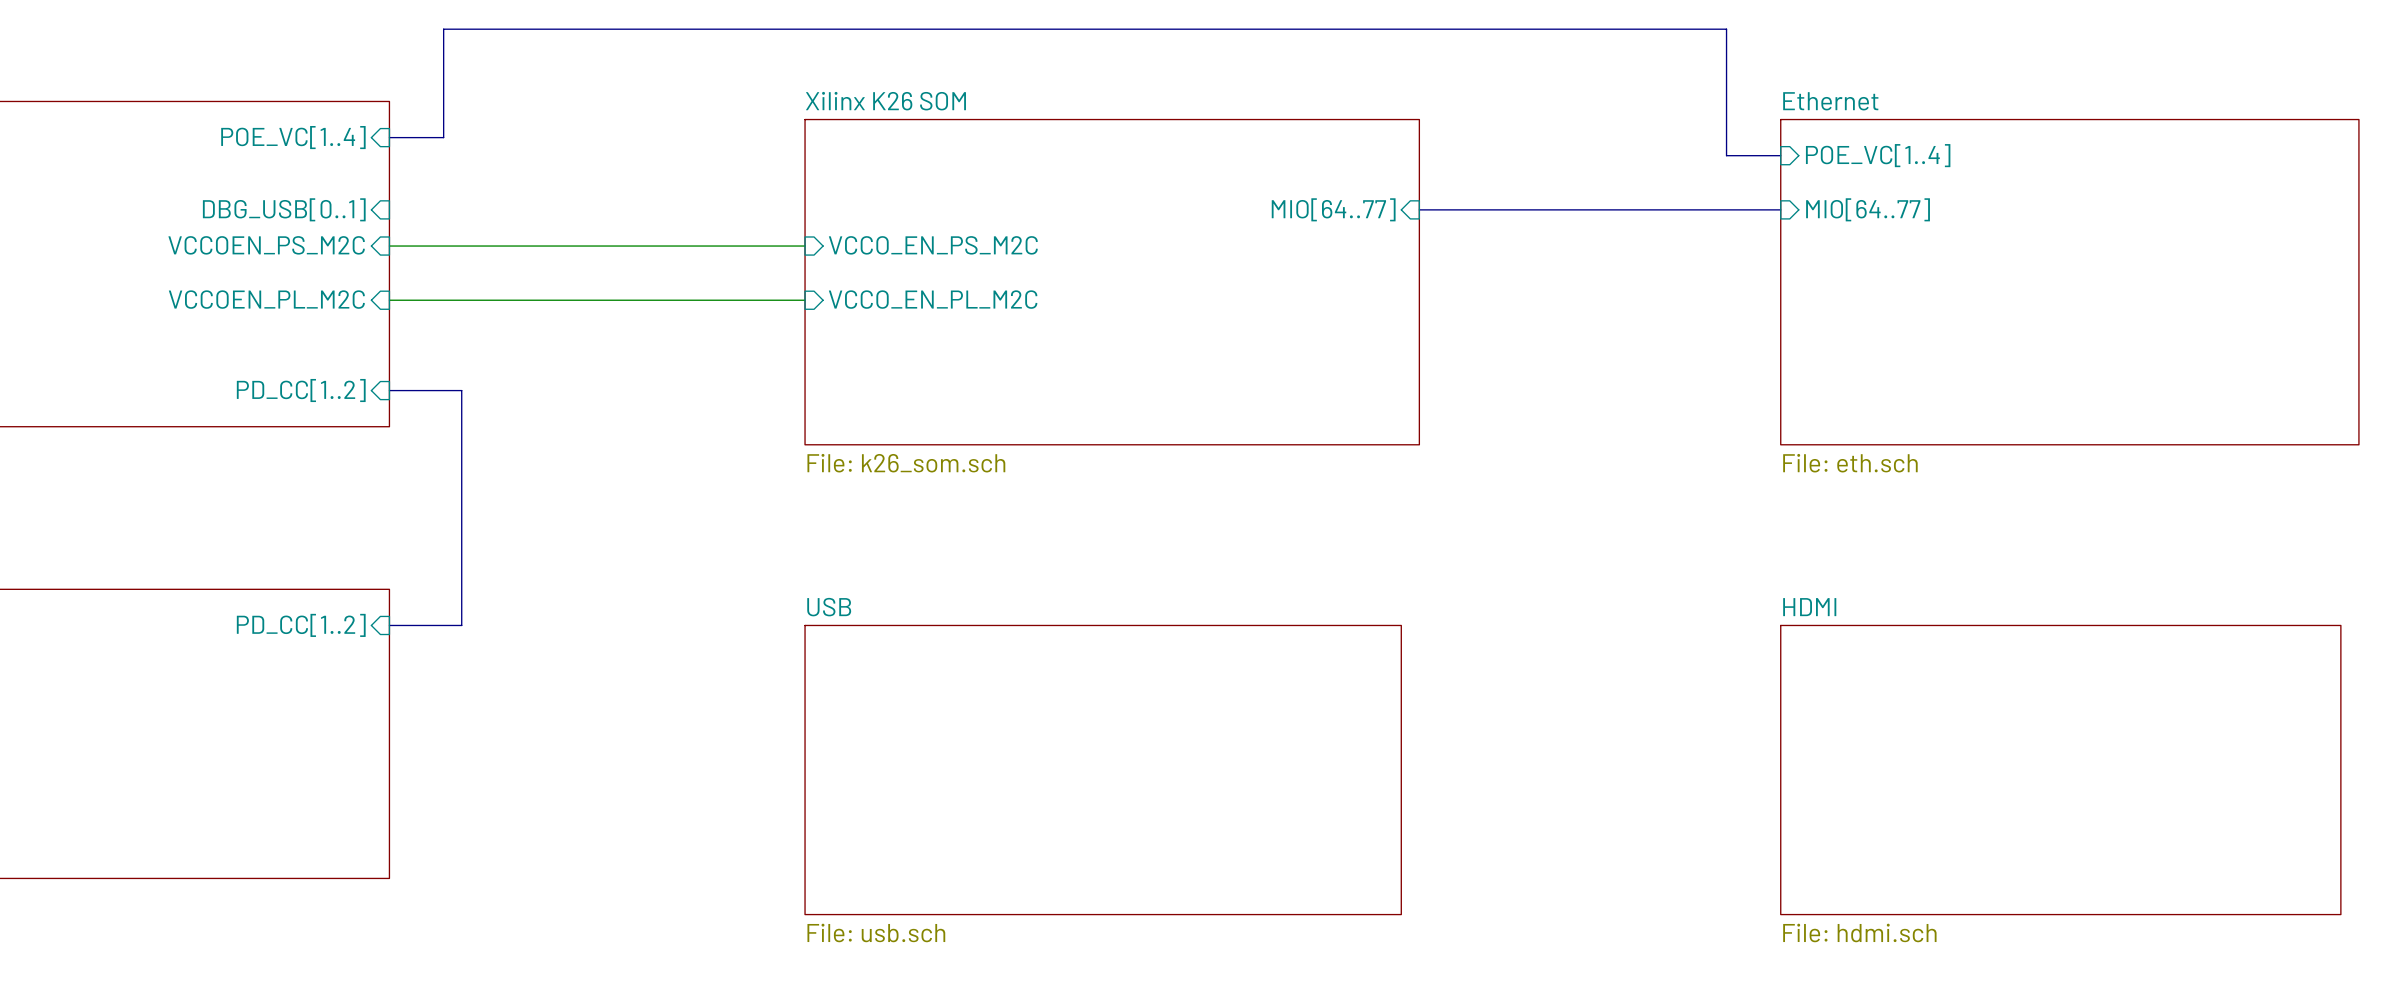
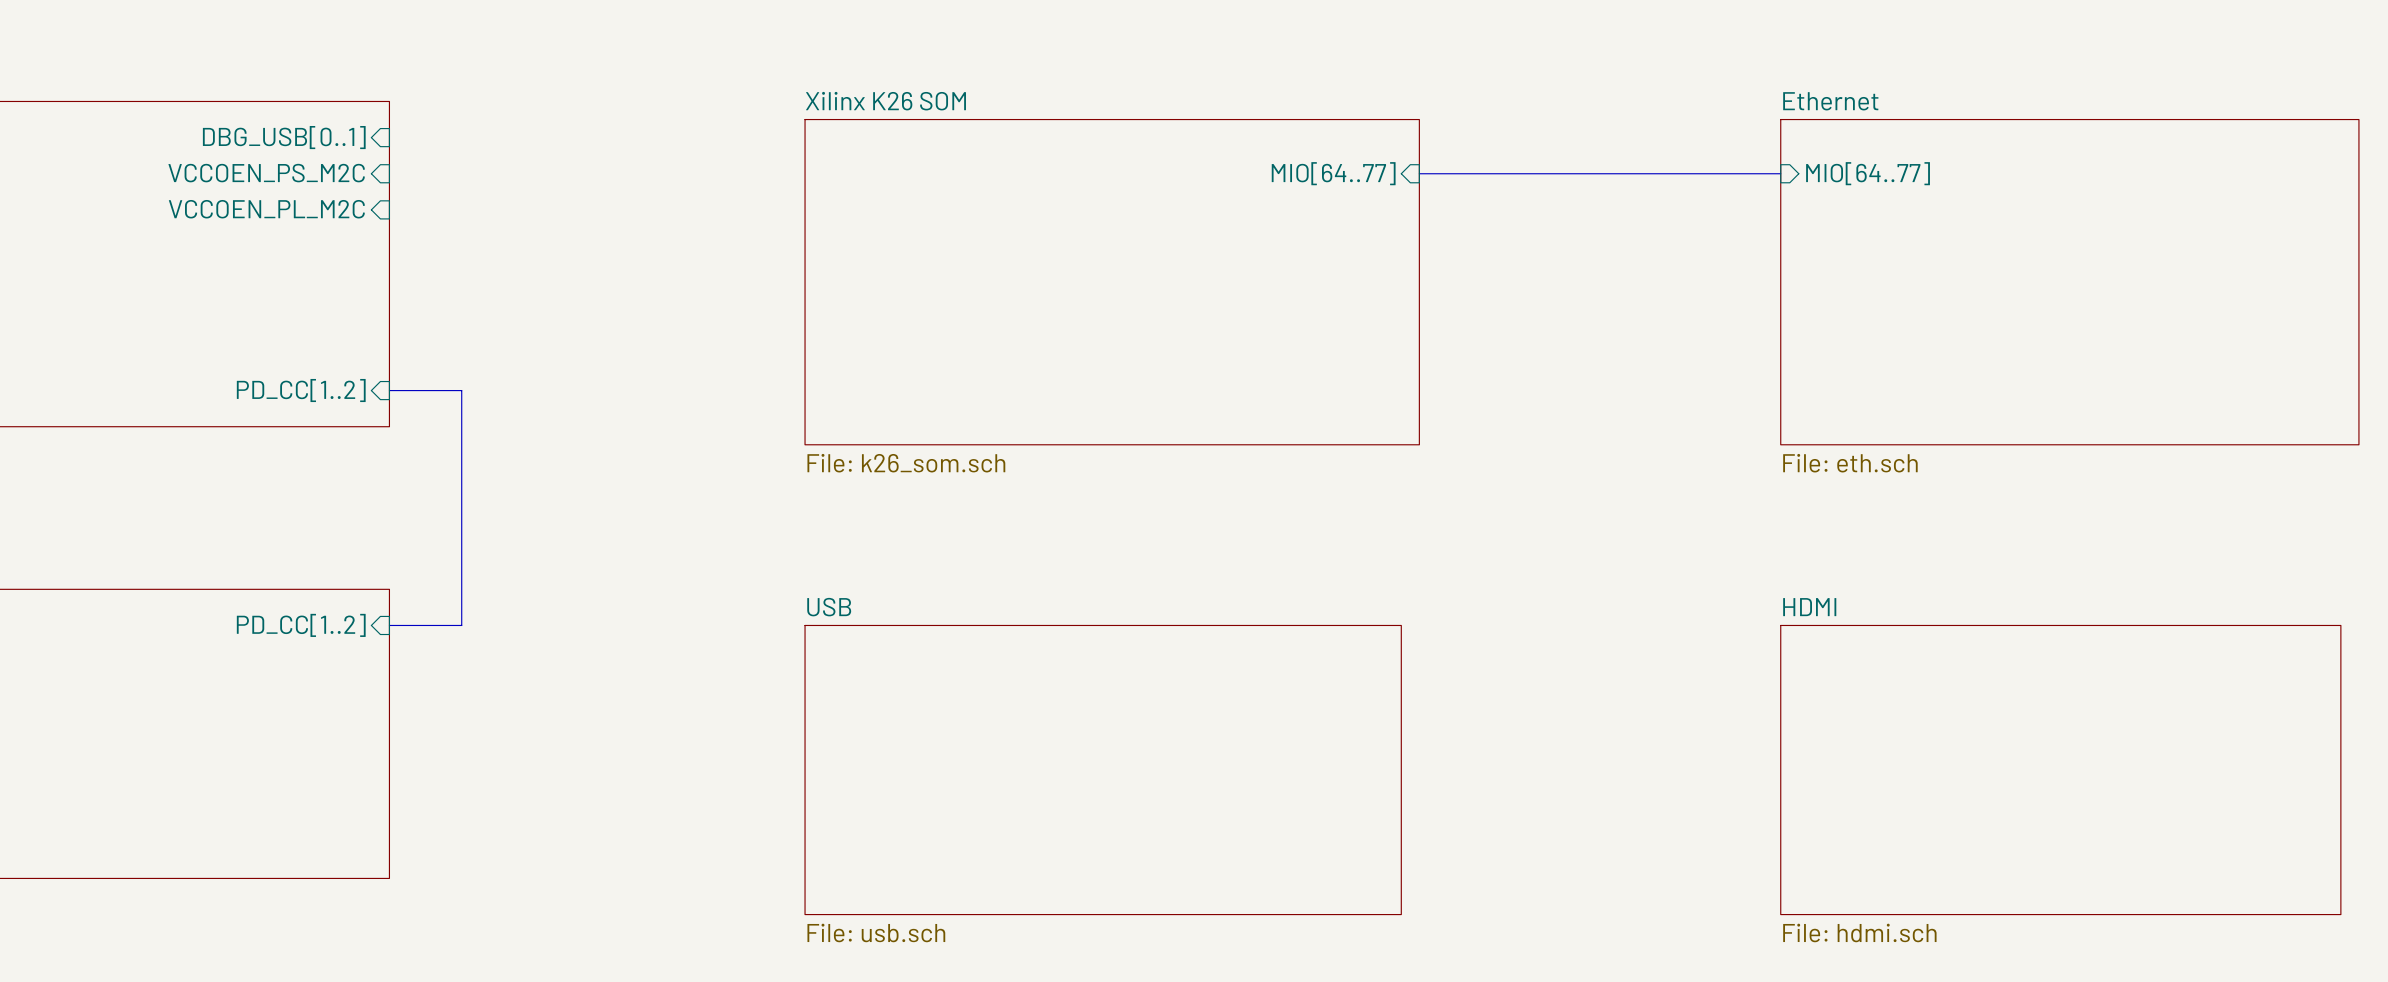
sheet pin: POE_VC[1..4] (293, 137) -> DBG_USB[0..1] (284, 137)
bus: (389, 137) (443, 137) (443, 29) (1726, 29) (1726, 155) (1780, 155) -> none
sheet pin: POE_VC[1..4] (1878, 155) -> none
sheet pin: DBG_USB[0..1] (284, 209) -> VCCOEN_PL_M2C (266, 209)
sheet pin position: MIO[64..77] (1333, 209) -> MIO[64..77] (1333, 173)
bus: (1419, 209) (1780, 209) -> (1419, 173) (1780, 173)
sheet pin position: MIO[64..77] (1868, 209) -> MIO[64..77] (1868, 173)
sheet pin position: VCCOEN_PS_M2C (266, 245) -> VCCOEN_PS_M2C (266, 173)
sheet pin: VCCO_EN_PS_M2C (933, 245) -> none
wire: (389, 246) (805, 246) -> none
sheet pin: VCCOEN_PL_M2C (266, 299) -> none
sheet pin: VCCO_EN_PL_M2C (933, 299) -> none
wire: (389, 300) (805, 300) -> none

